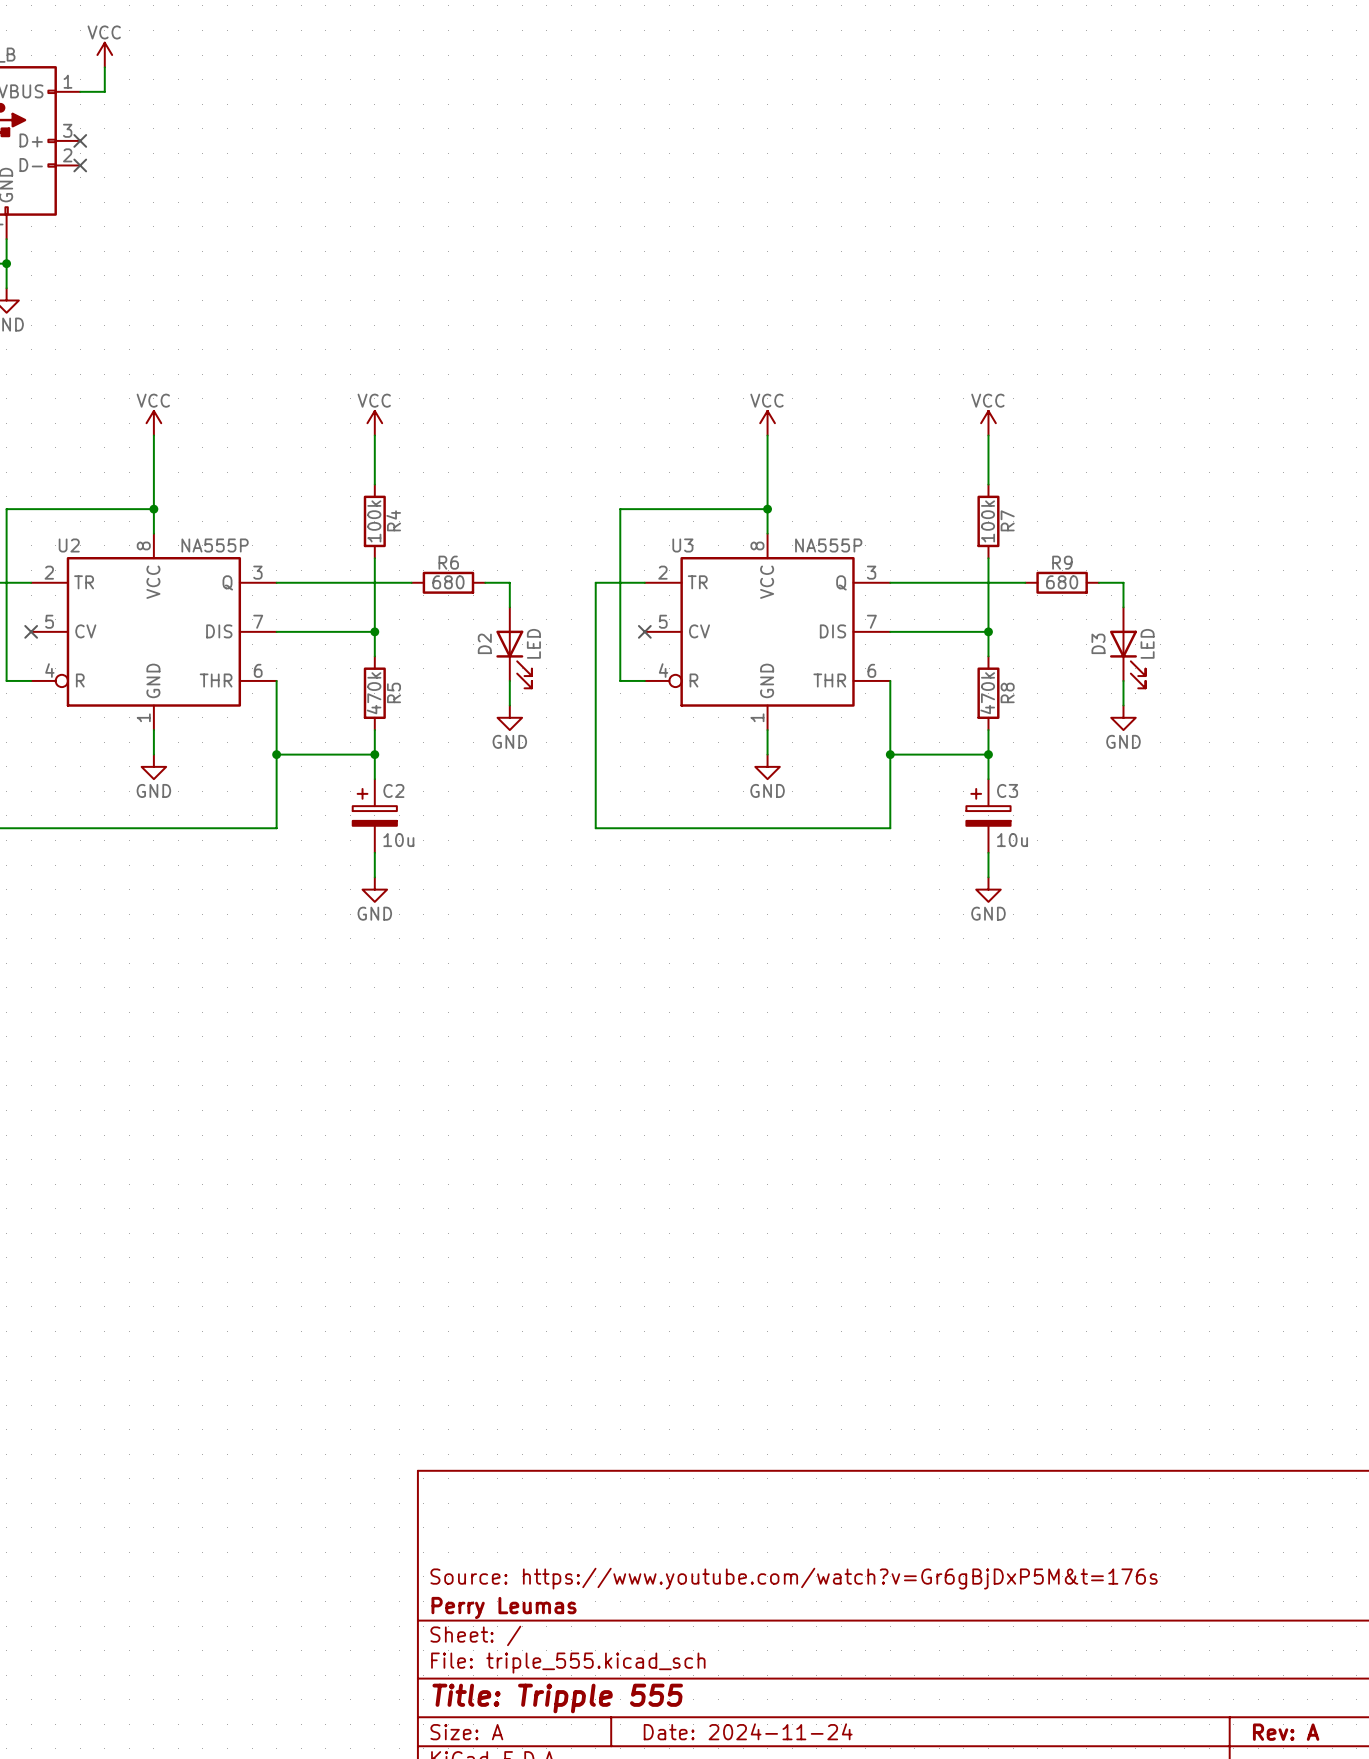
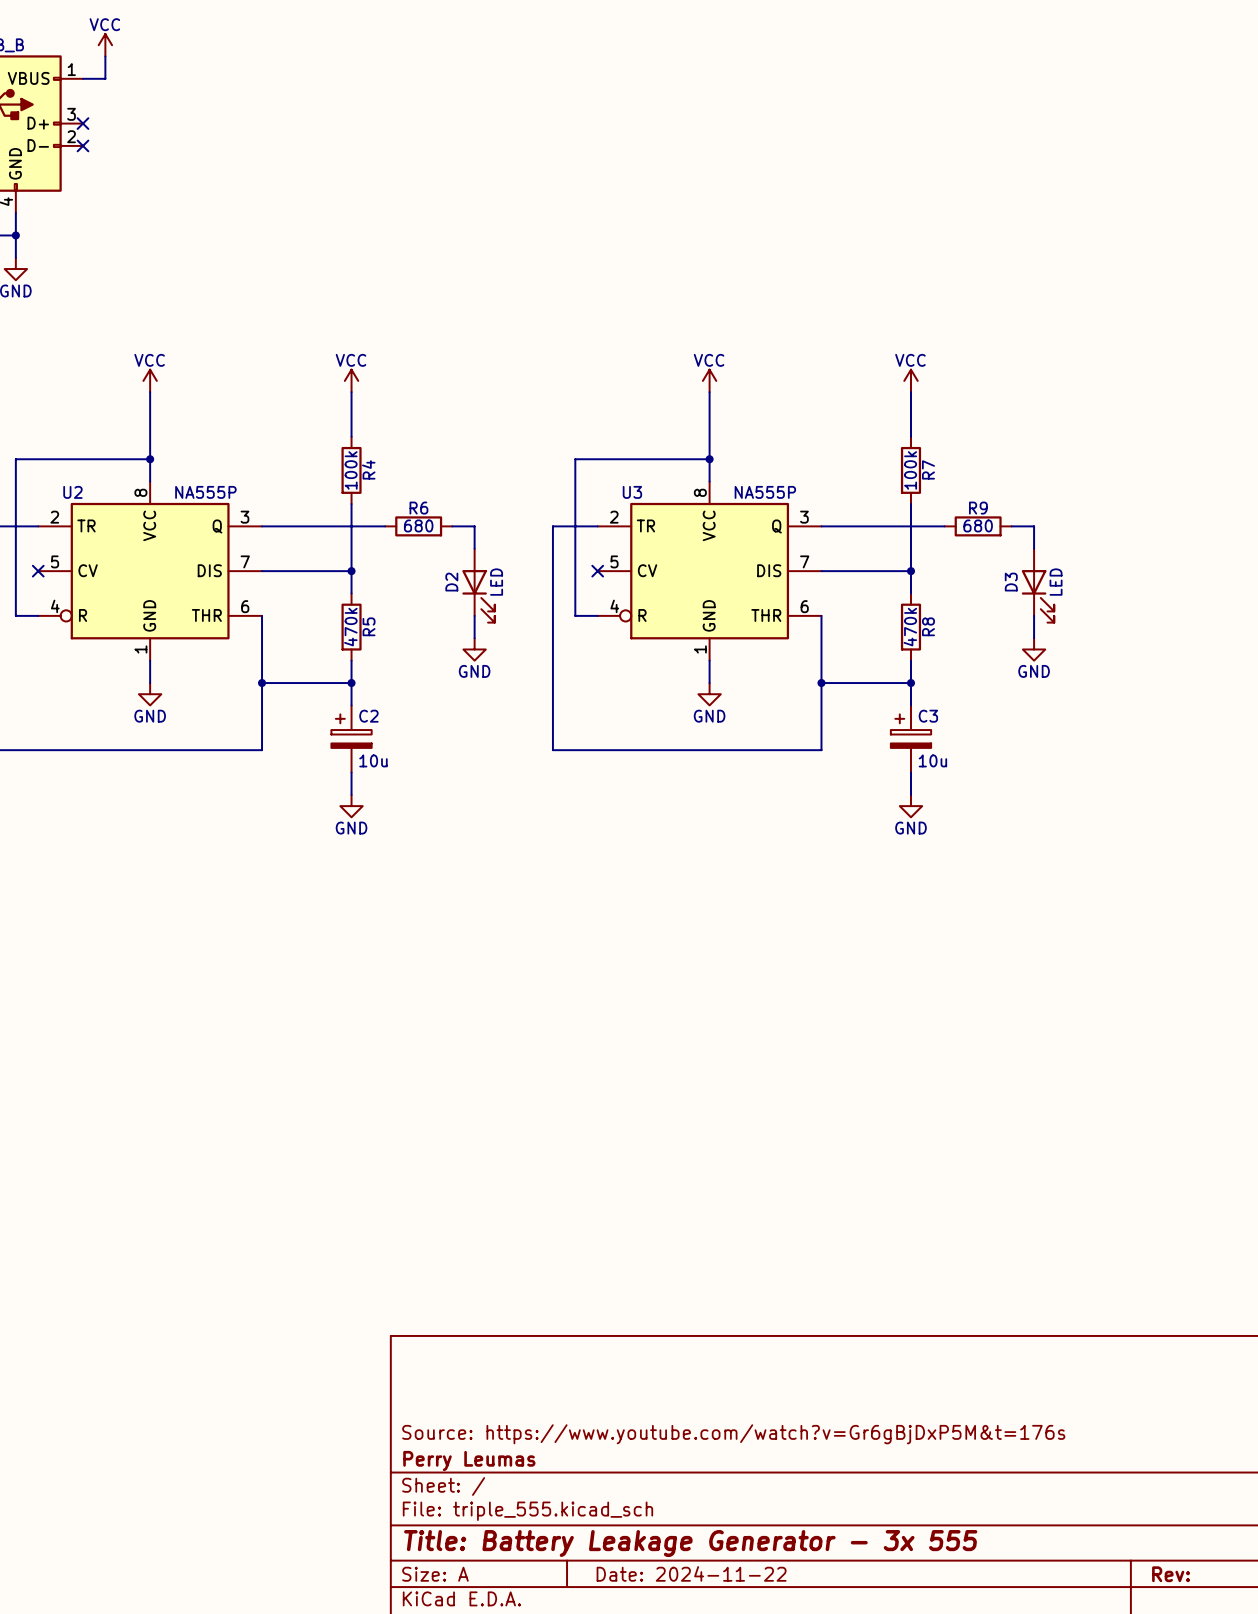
title block: Title: Tripple 555 (557, 1698) -> Title: Battery Leakage Generator - 3x 555 (690, 1543)
title block: Date: 2024-11-24 (748, 1731) -> Date: 2024-11-22 (691, 1573)
title block: Rev: A (1286, 1732) -> Rev: (1171, 1574)

